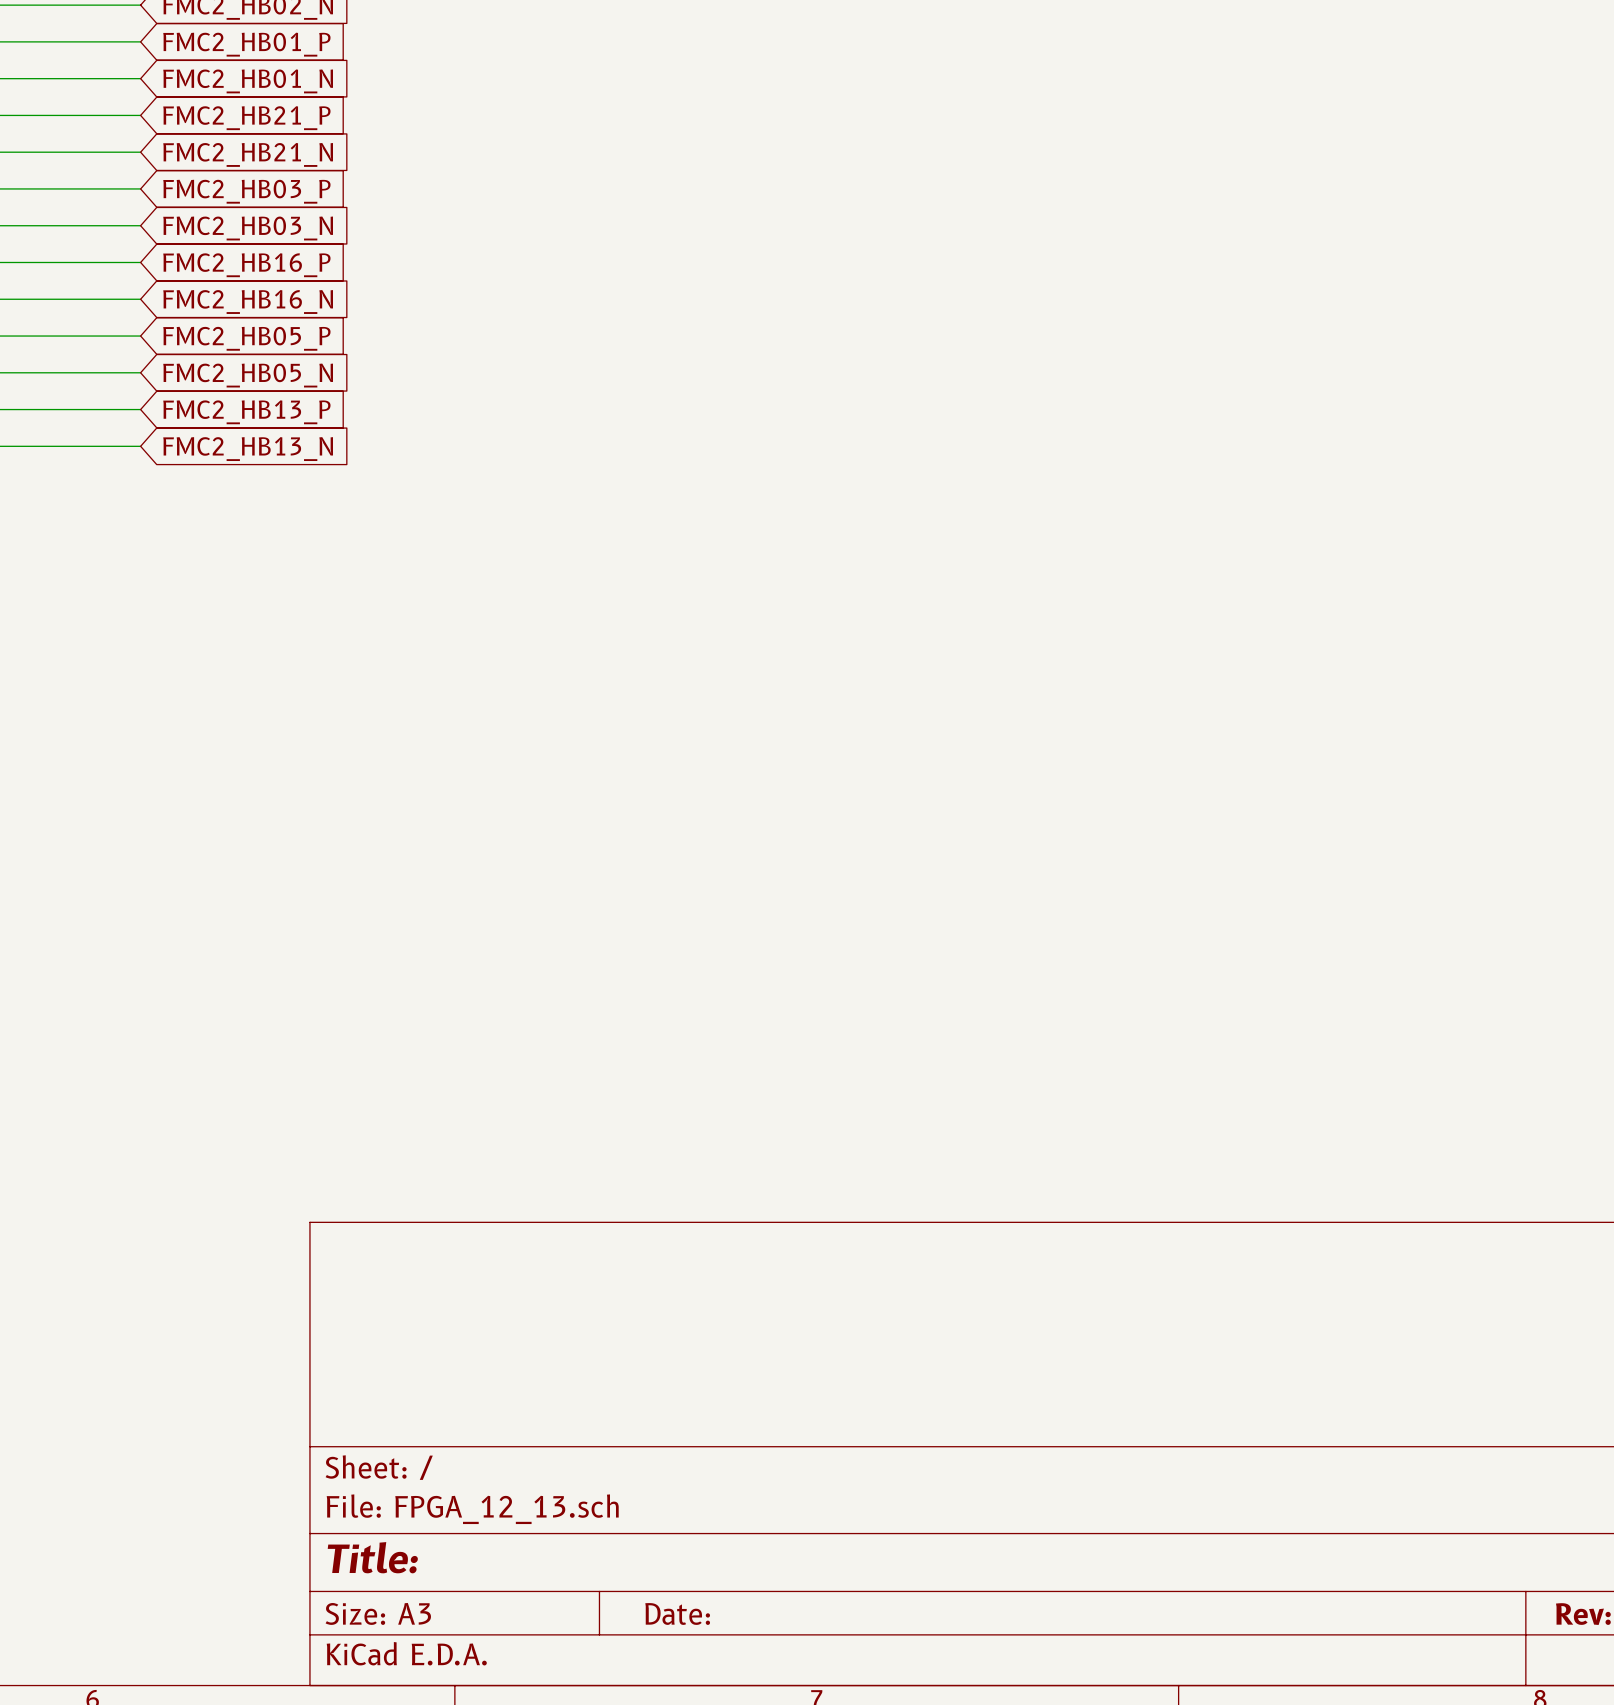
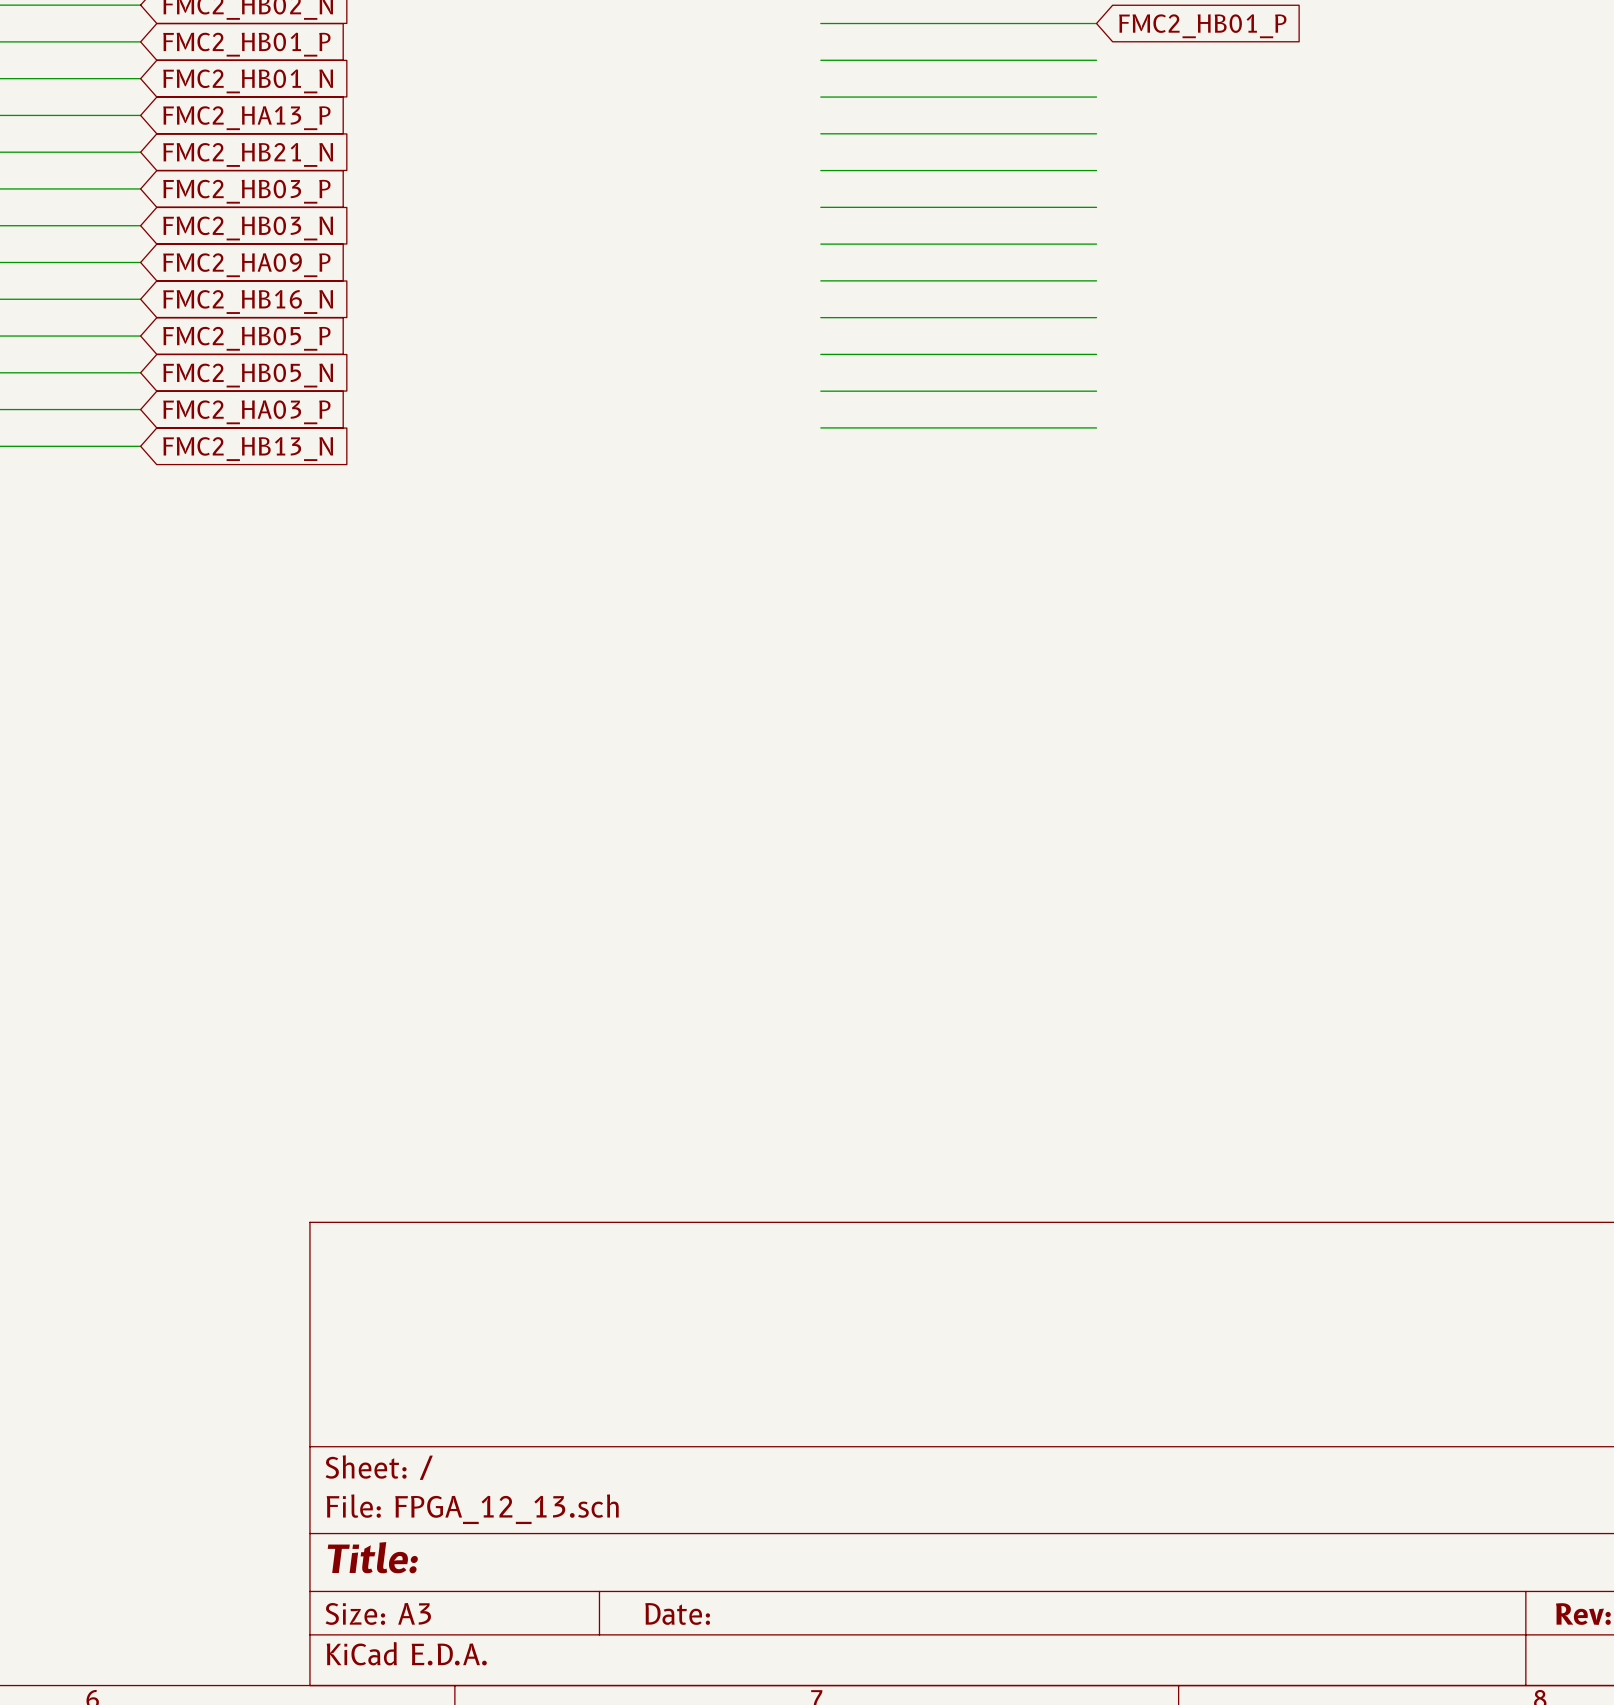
wire: none -> (820, 23) (1096, 23)
global label: none -> FMC2_HB01_P (1202, 26)
wire: none -> (820, 60) (1096, 60)
wire: none -> (820, 97) (1096, 97)
global label: FMC2_HB21_P (246, 118) -> FMC2_HA13_P (246, 118)
wire: none -> (820, 133) (1096, 133)
wire: none -> (820, 170) (1096, 170)
wire: none -> (820, 207) (1096, 207)
wire: none -> (820, 244) (1096, 244)
global label: FMC2_HB16_P (246, 265) -> FMC2_HA09_P (246, 265)
wire: none -> (820, 280) (1096, 280)
wire: none -> (820, 317) (1096, 317)
wire: none -> (820, 354) (1096, 354)
wire: none -> (820, 391) (1096, 391)
global label: FMC2_HB13_P (246, 412) -> FMC2_HA03_P (246, 412)
wire: none -> (820, 427) (1096, 427)

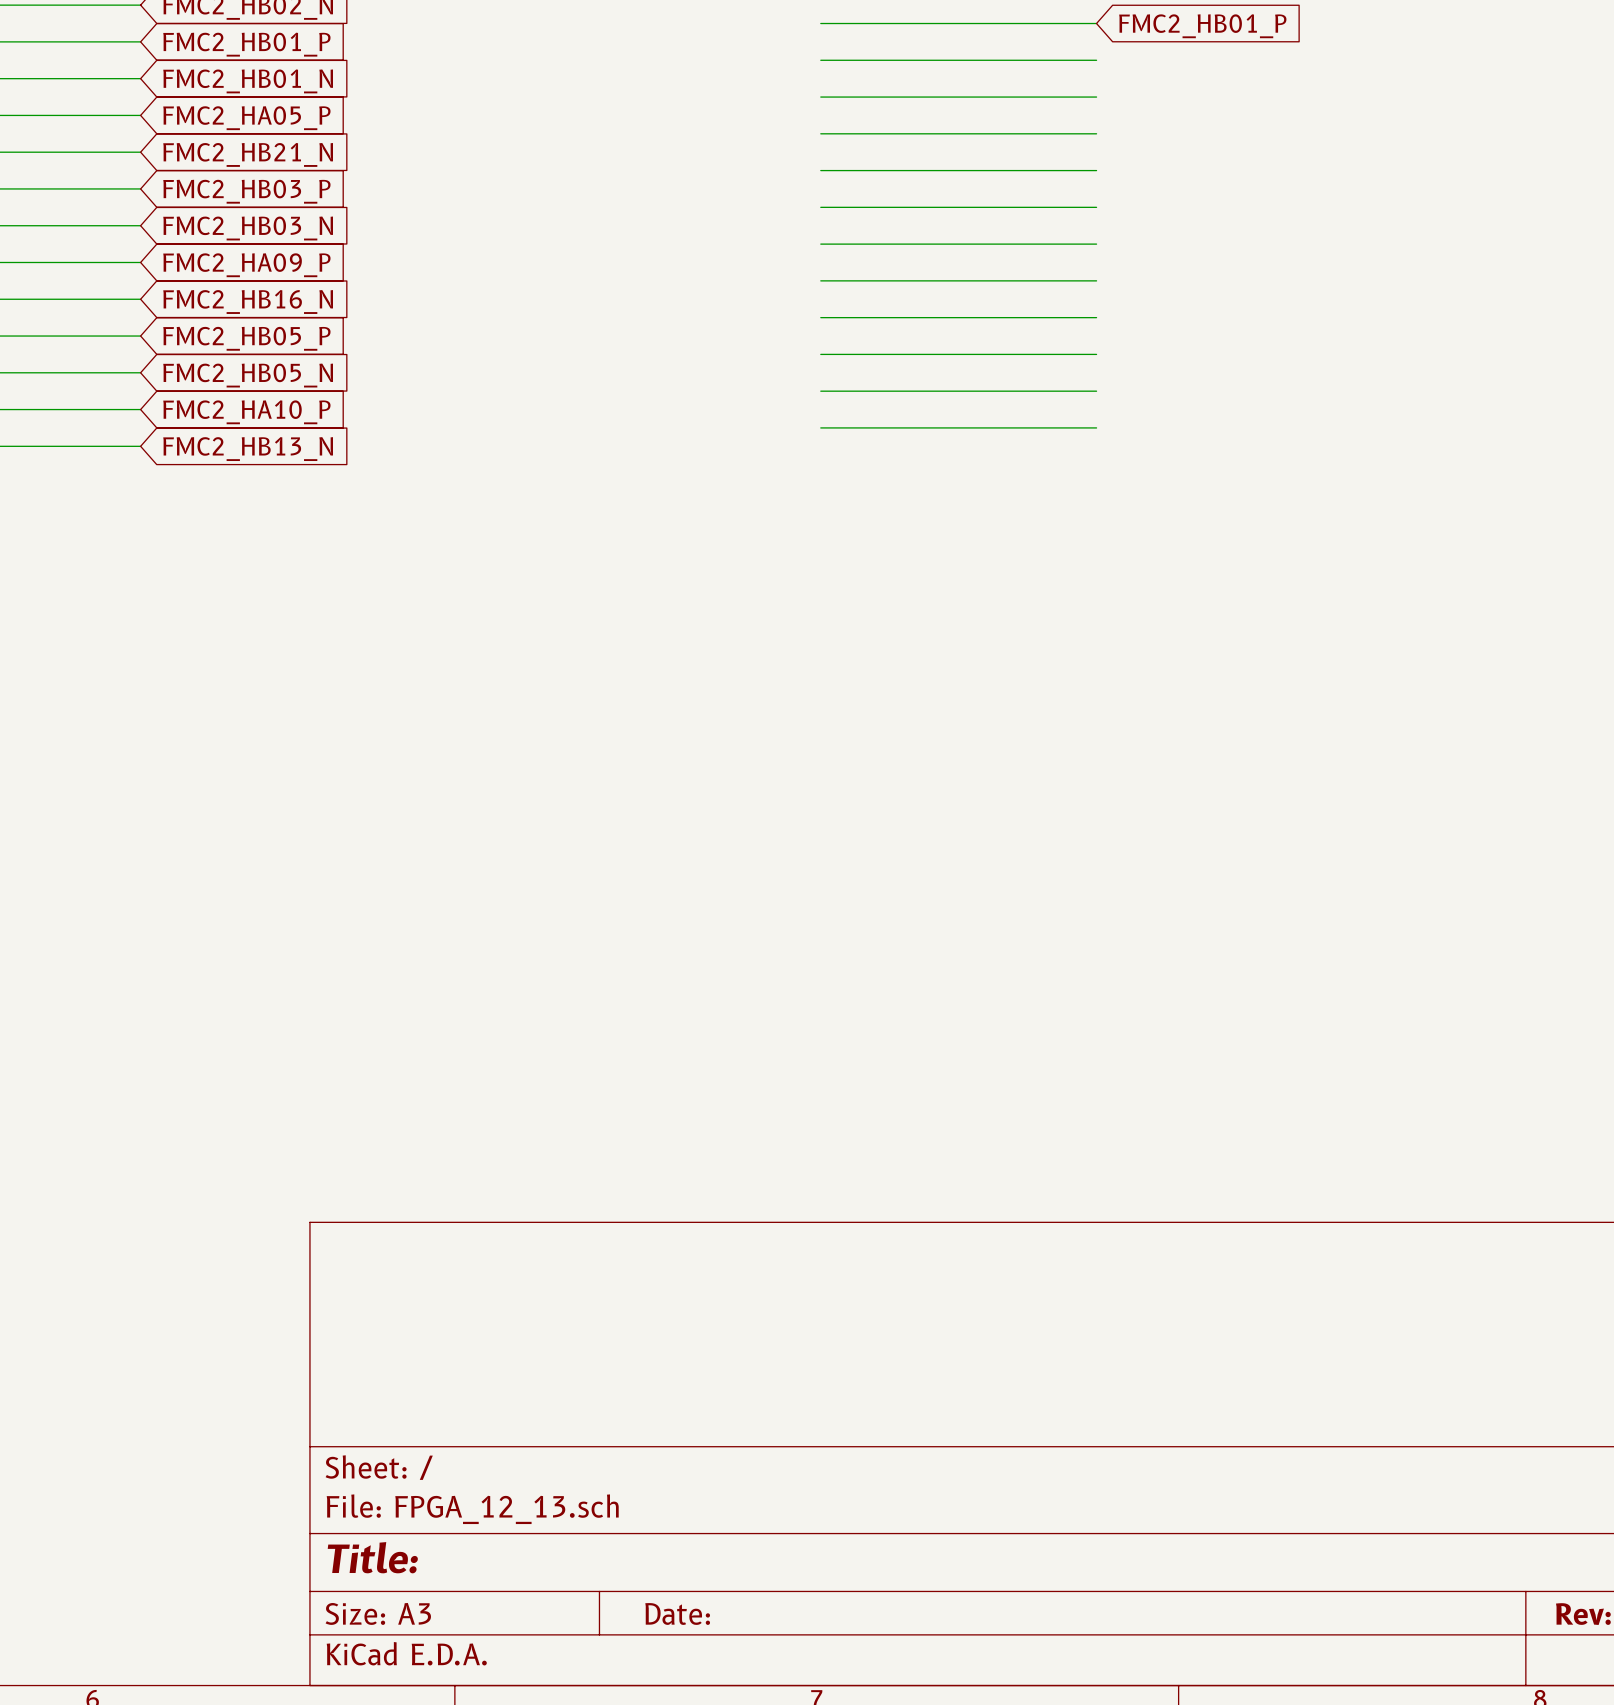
global label: FMC2_HA13_P (246, 118) -> FMC2_HA05_P (246, 118)
global label: FMC2_HA03_P (246, 412) -> FMC2_HA10_P (246, 412)

